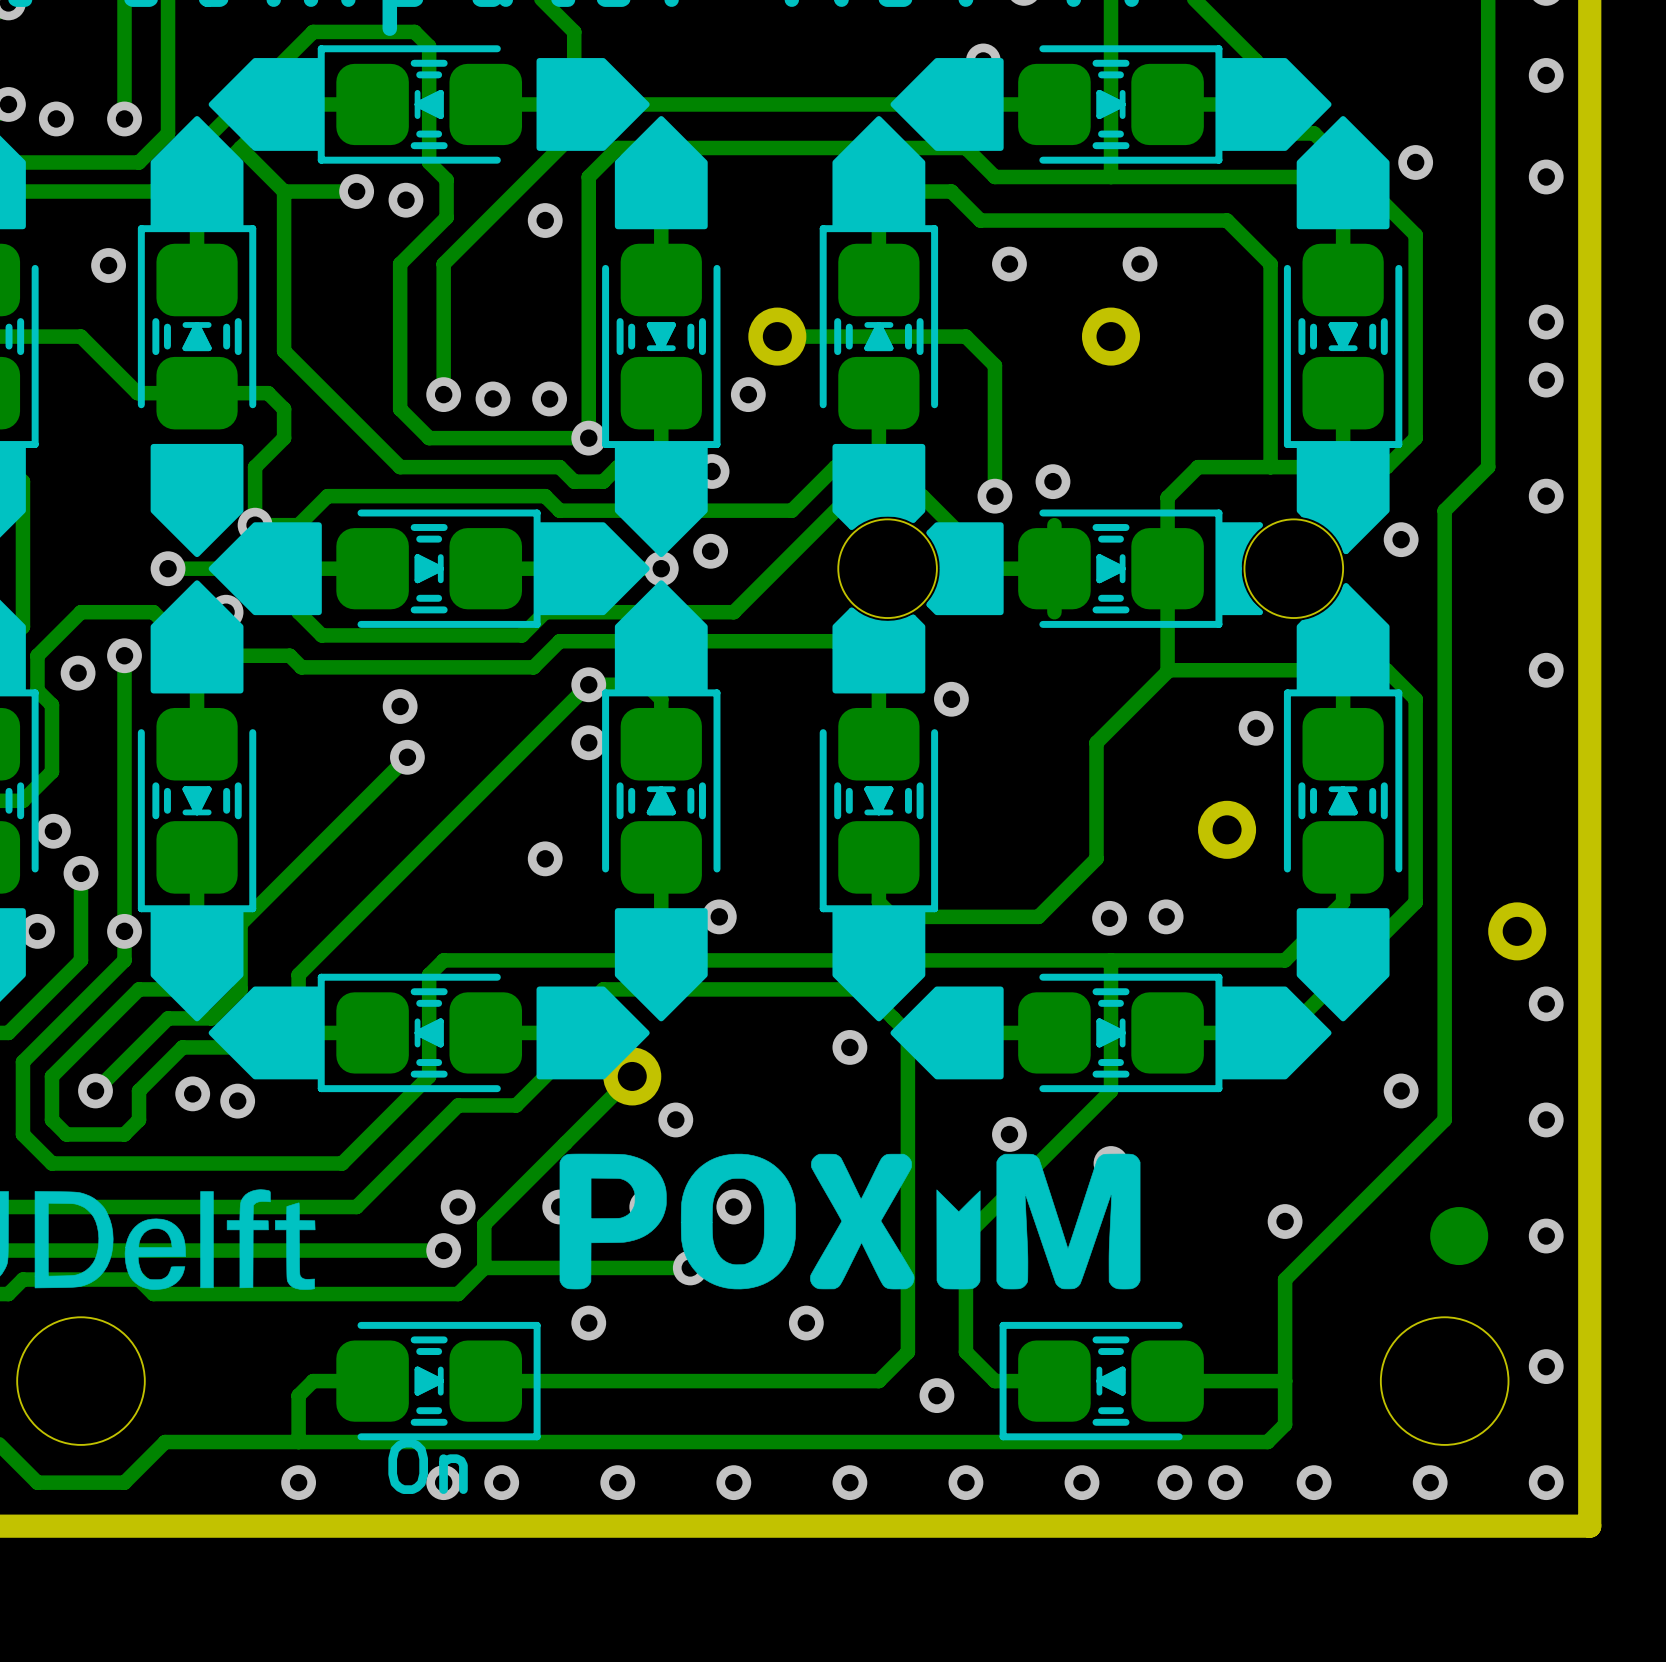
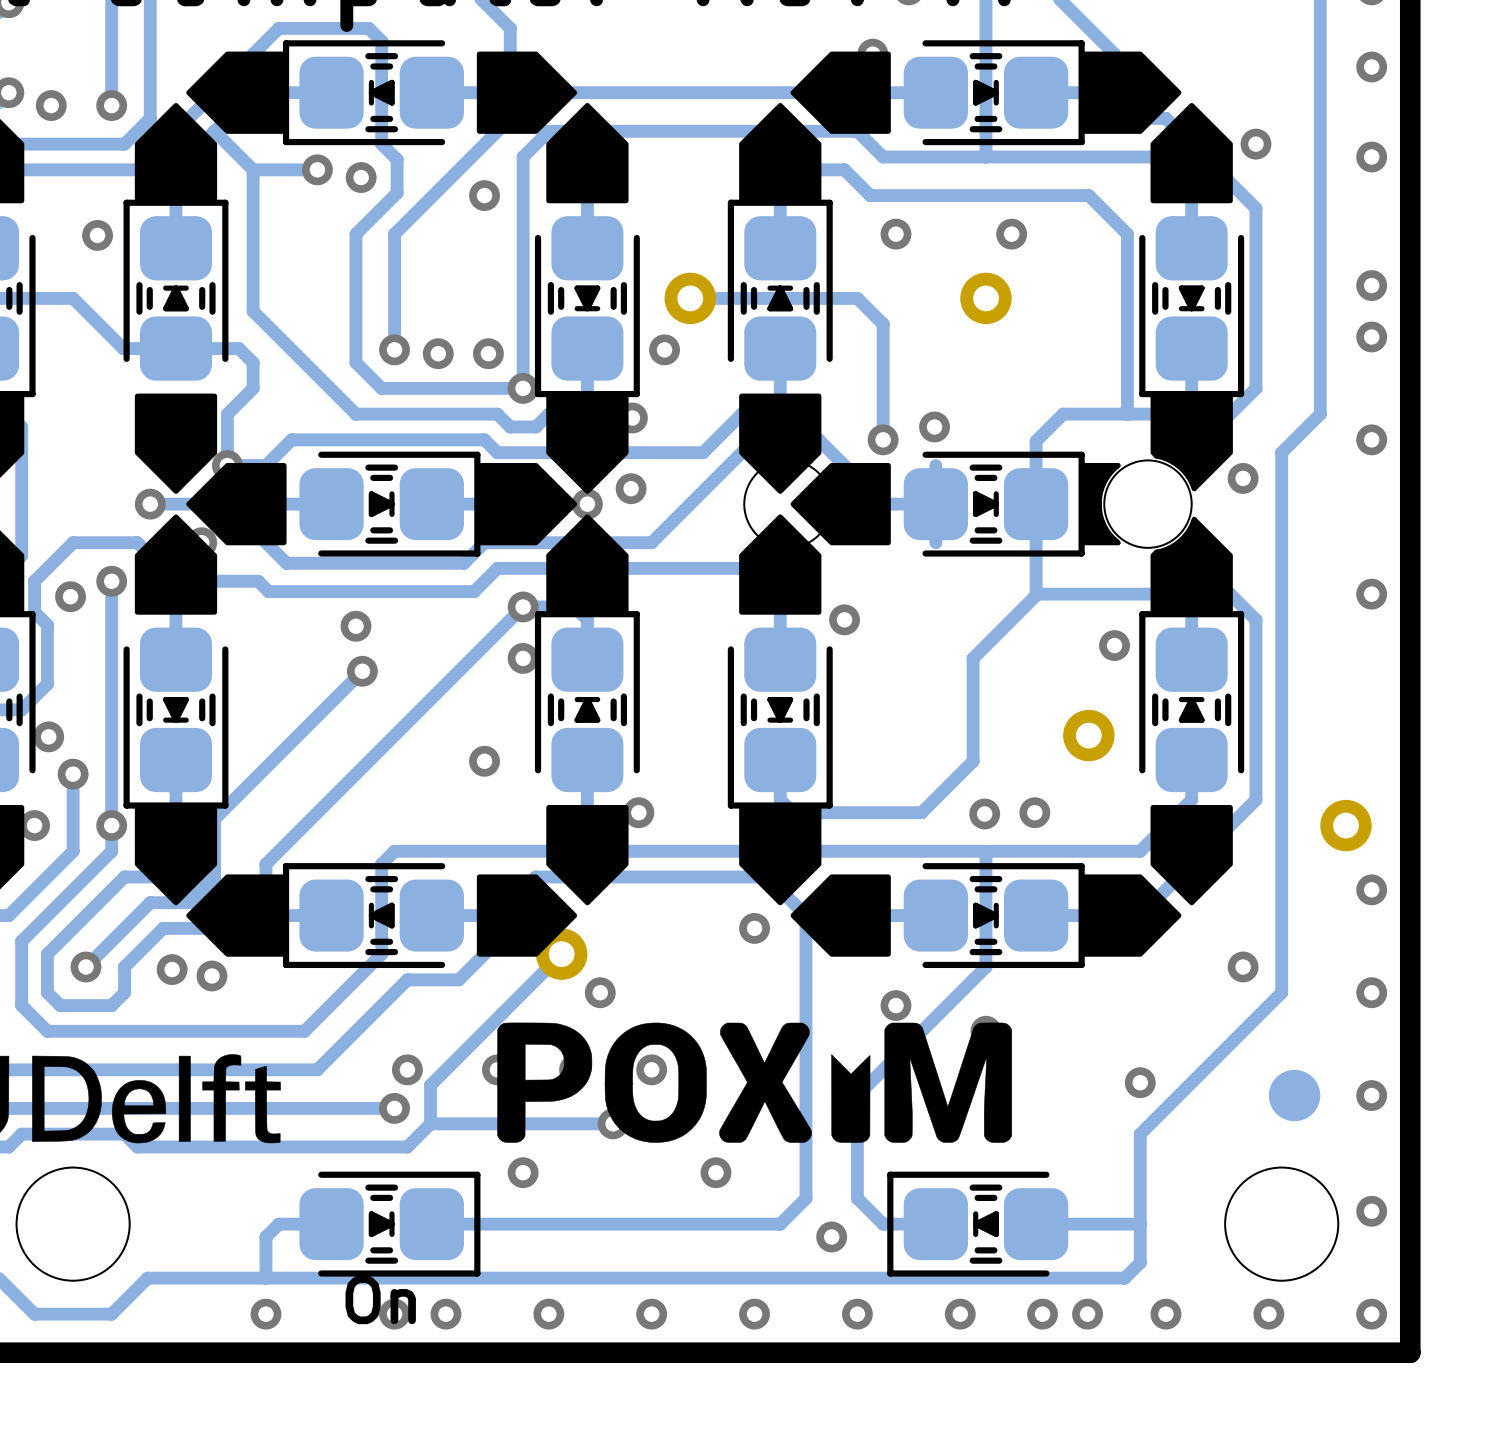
drawing shape: [832, 443, 926, 530] -> [739, 393, 822, 494]
drawing shape: [926, 522, 1004, 616] -> [790, 462, 891, 546]
drawing shape: [832, 607, 926, 694] -> [739, 514, 822, 615]

